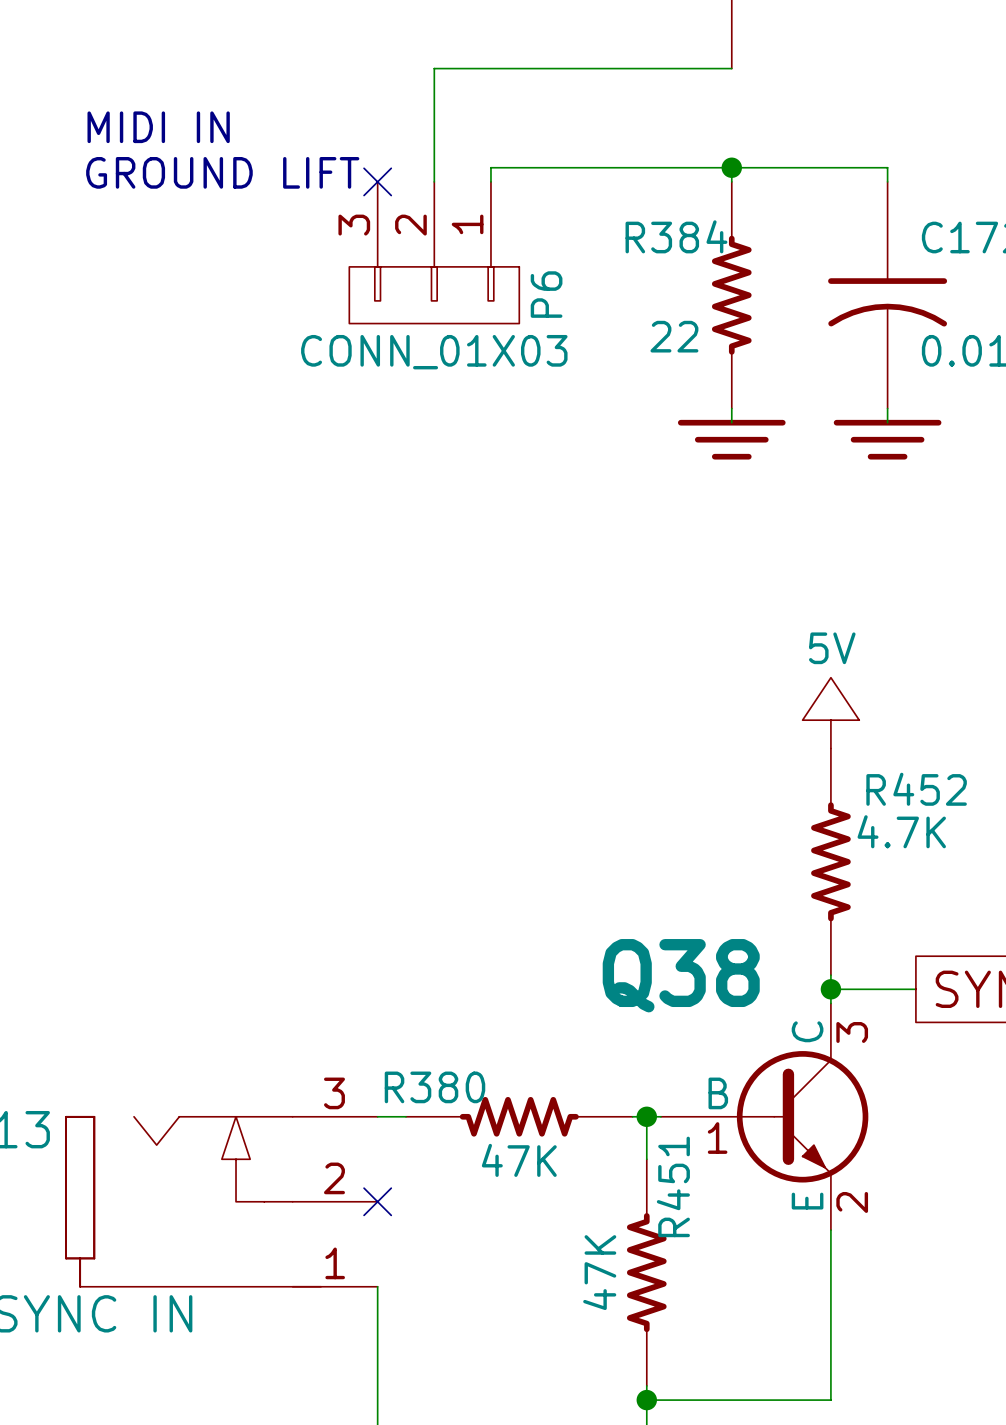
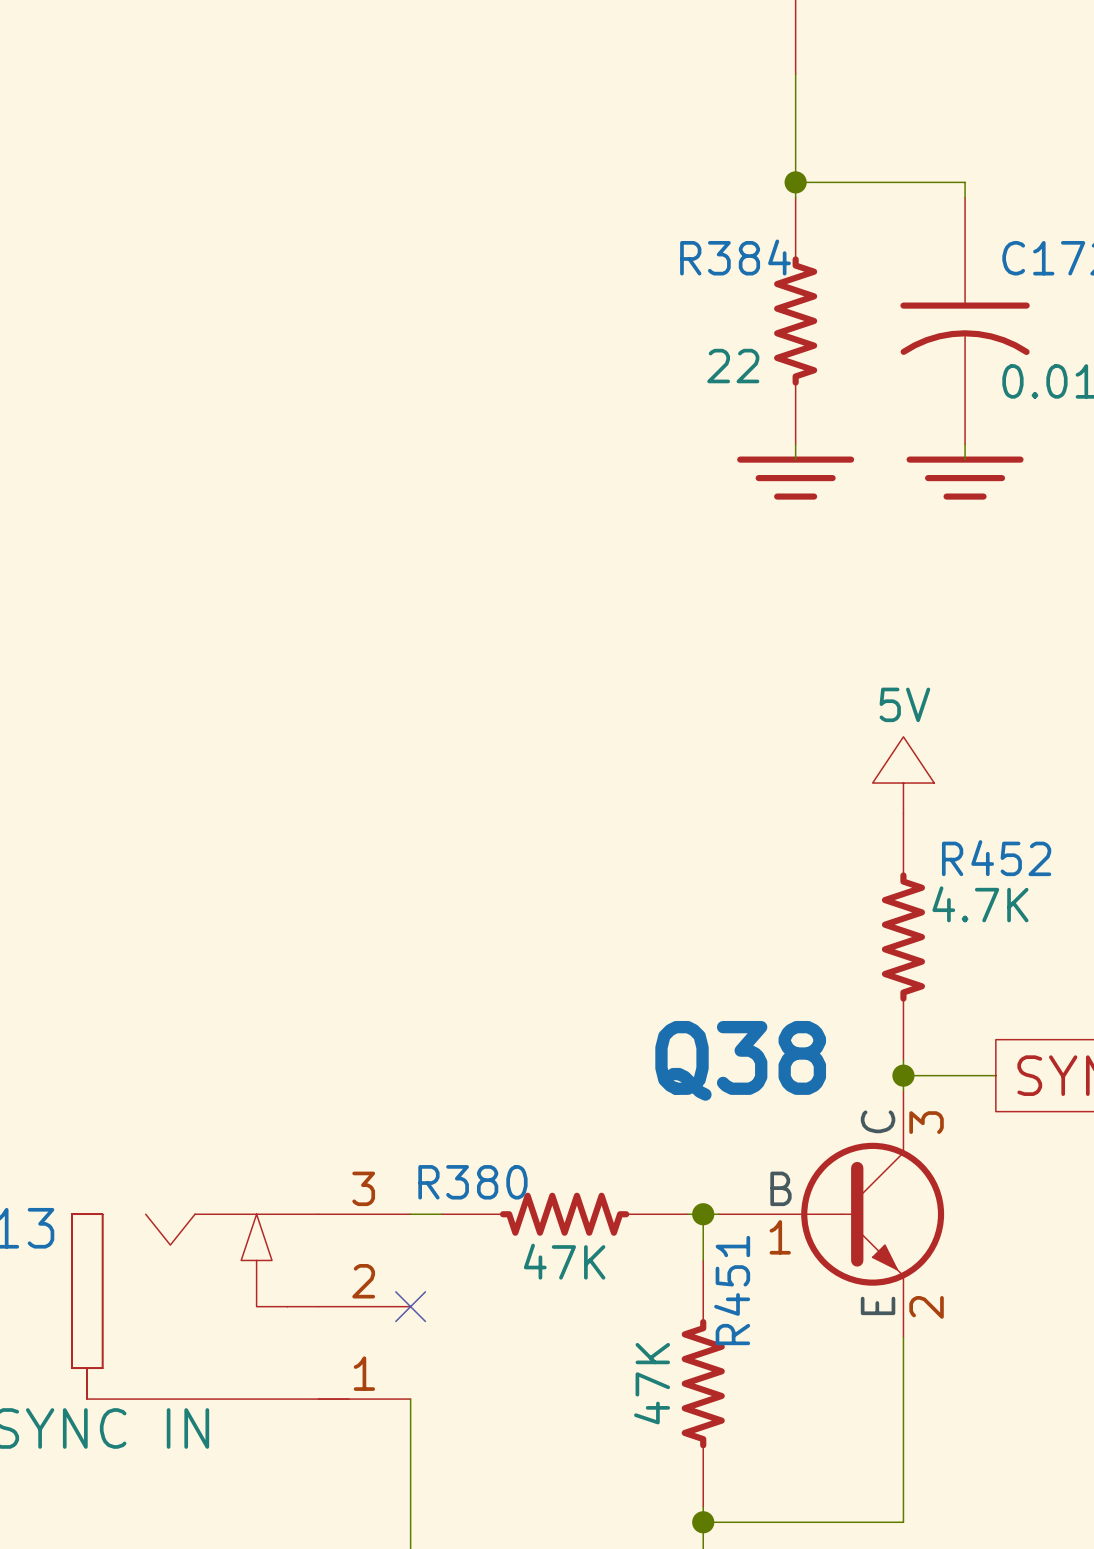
wire: (731, 68) (434, 68) (434, 181) -> none
text: MIDI IN (158, 127) -> none
wire: (731, 167) (490, 167) (490, 181) -> (795, 182) (795, 74)
text: GROUND LIFT (222, 172) -> none
no-connect mark: (377, 181) -> none
P6: CONN_01X03 (434, 252) -> none

